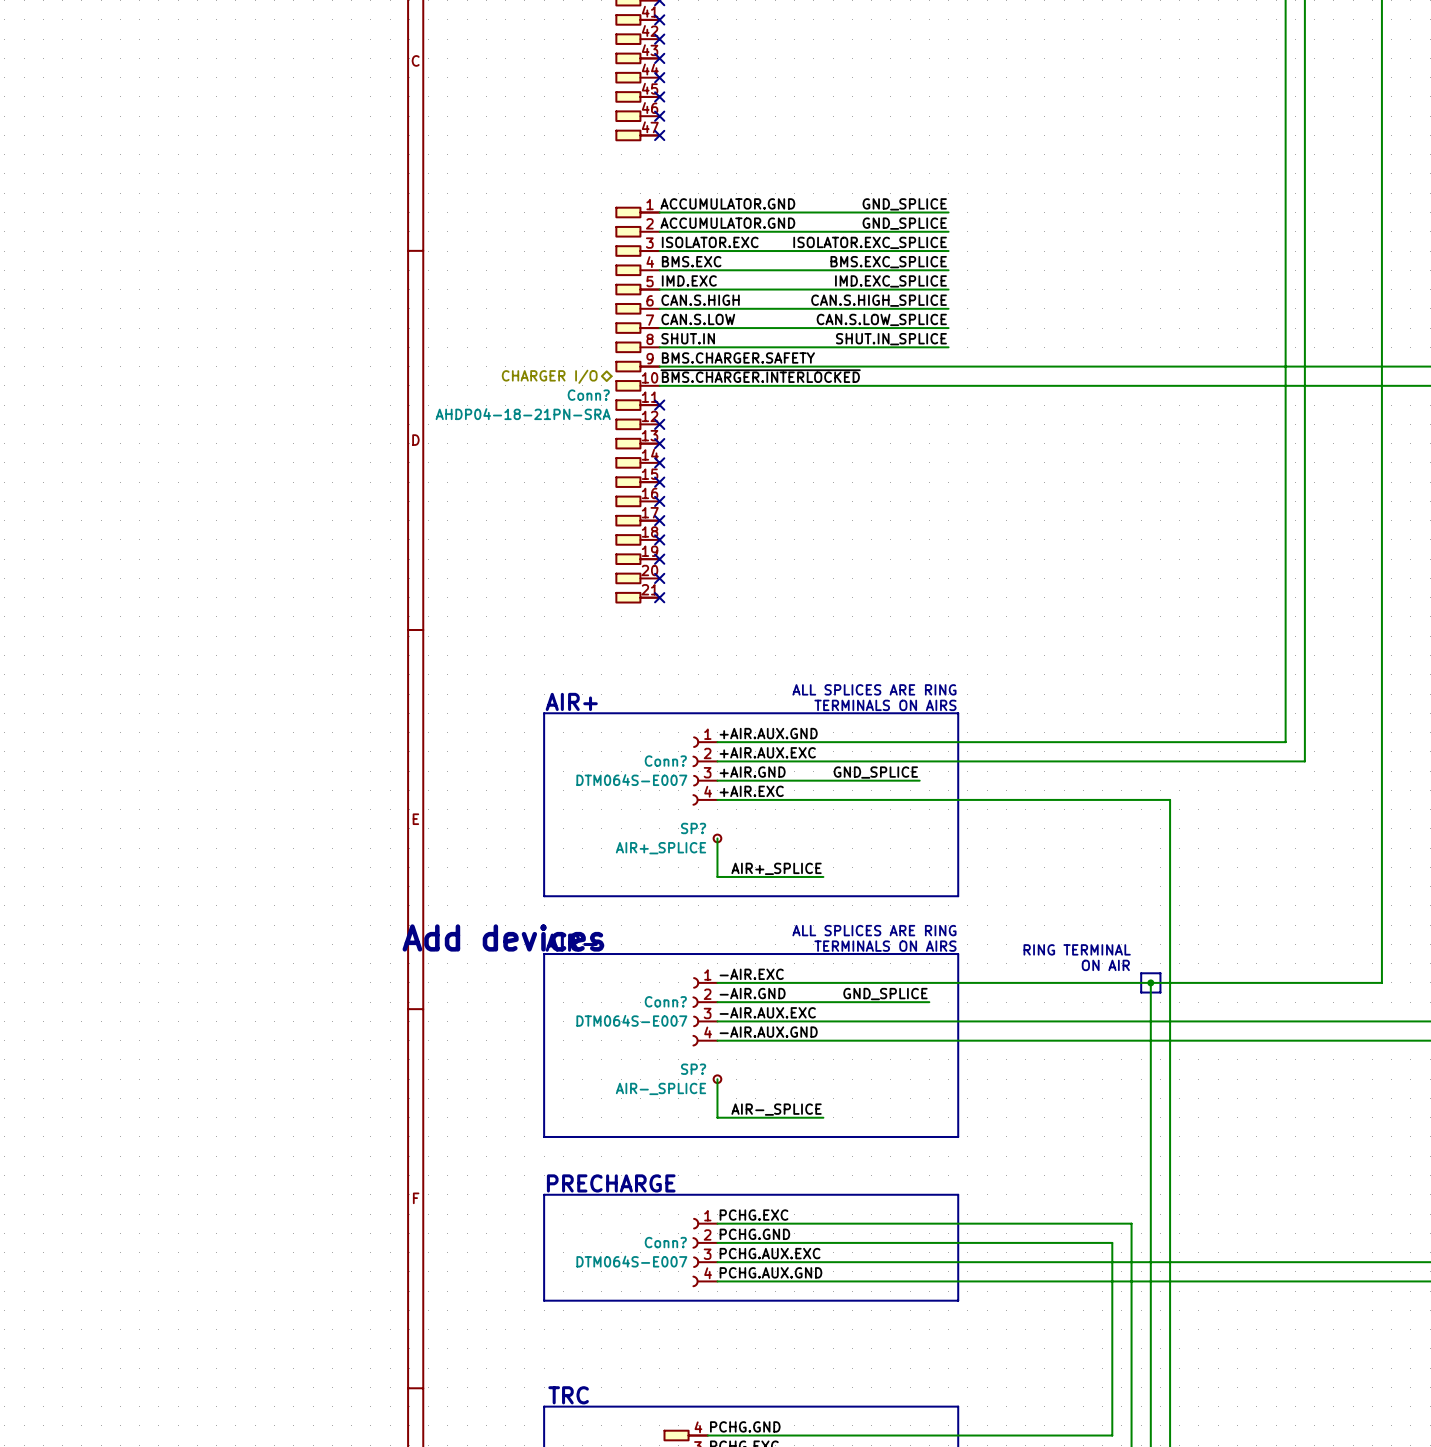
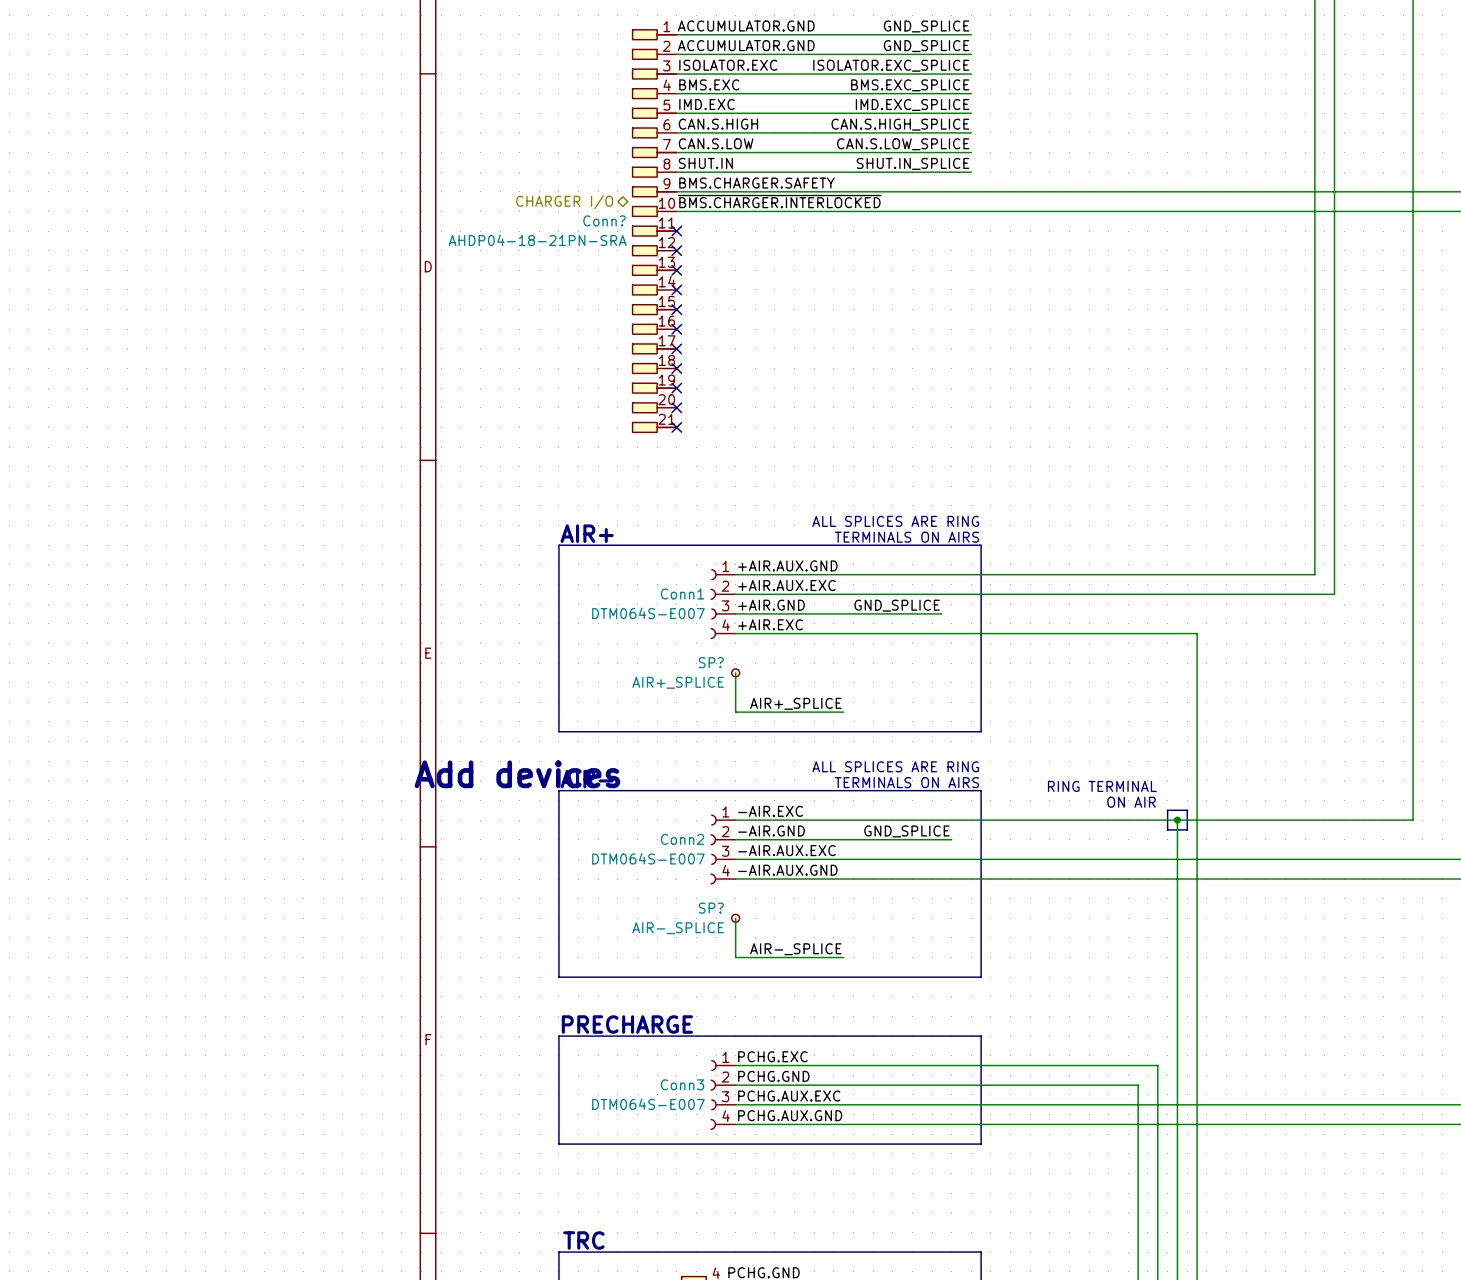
Conn? name: Conn? (665, 761) -> Conn1 (682, 593)
Conn? name: Conn? (665, 1001) -> Conn2 (682, 839)
Conn? name: Conn? (665, 1242) -> Conn3 (682, 1084)

